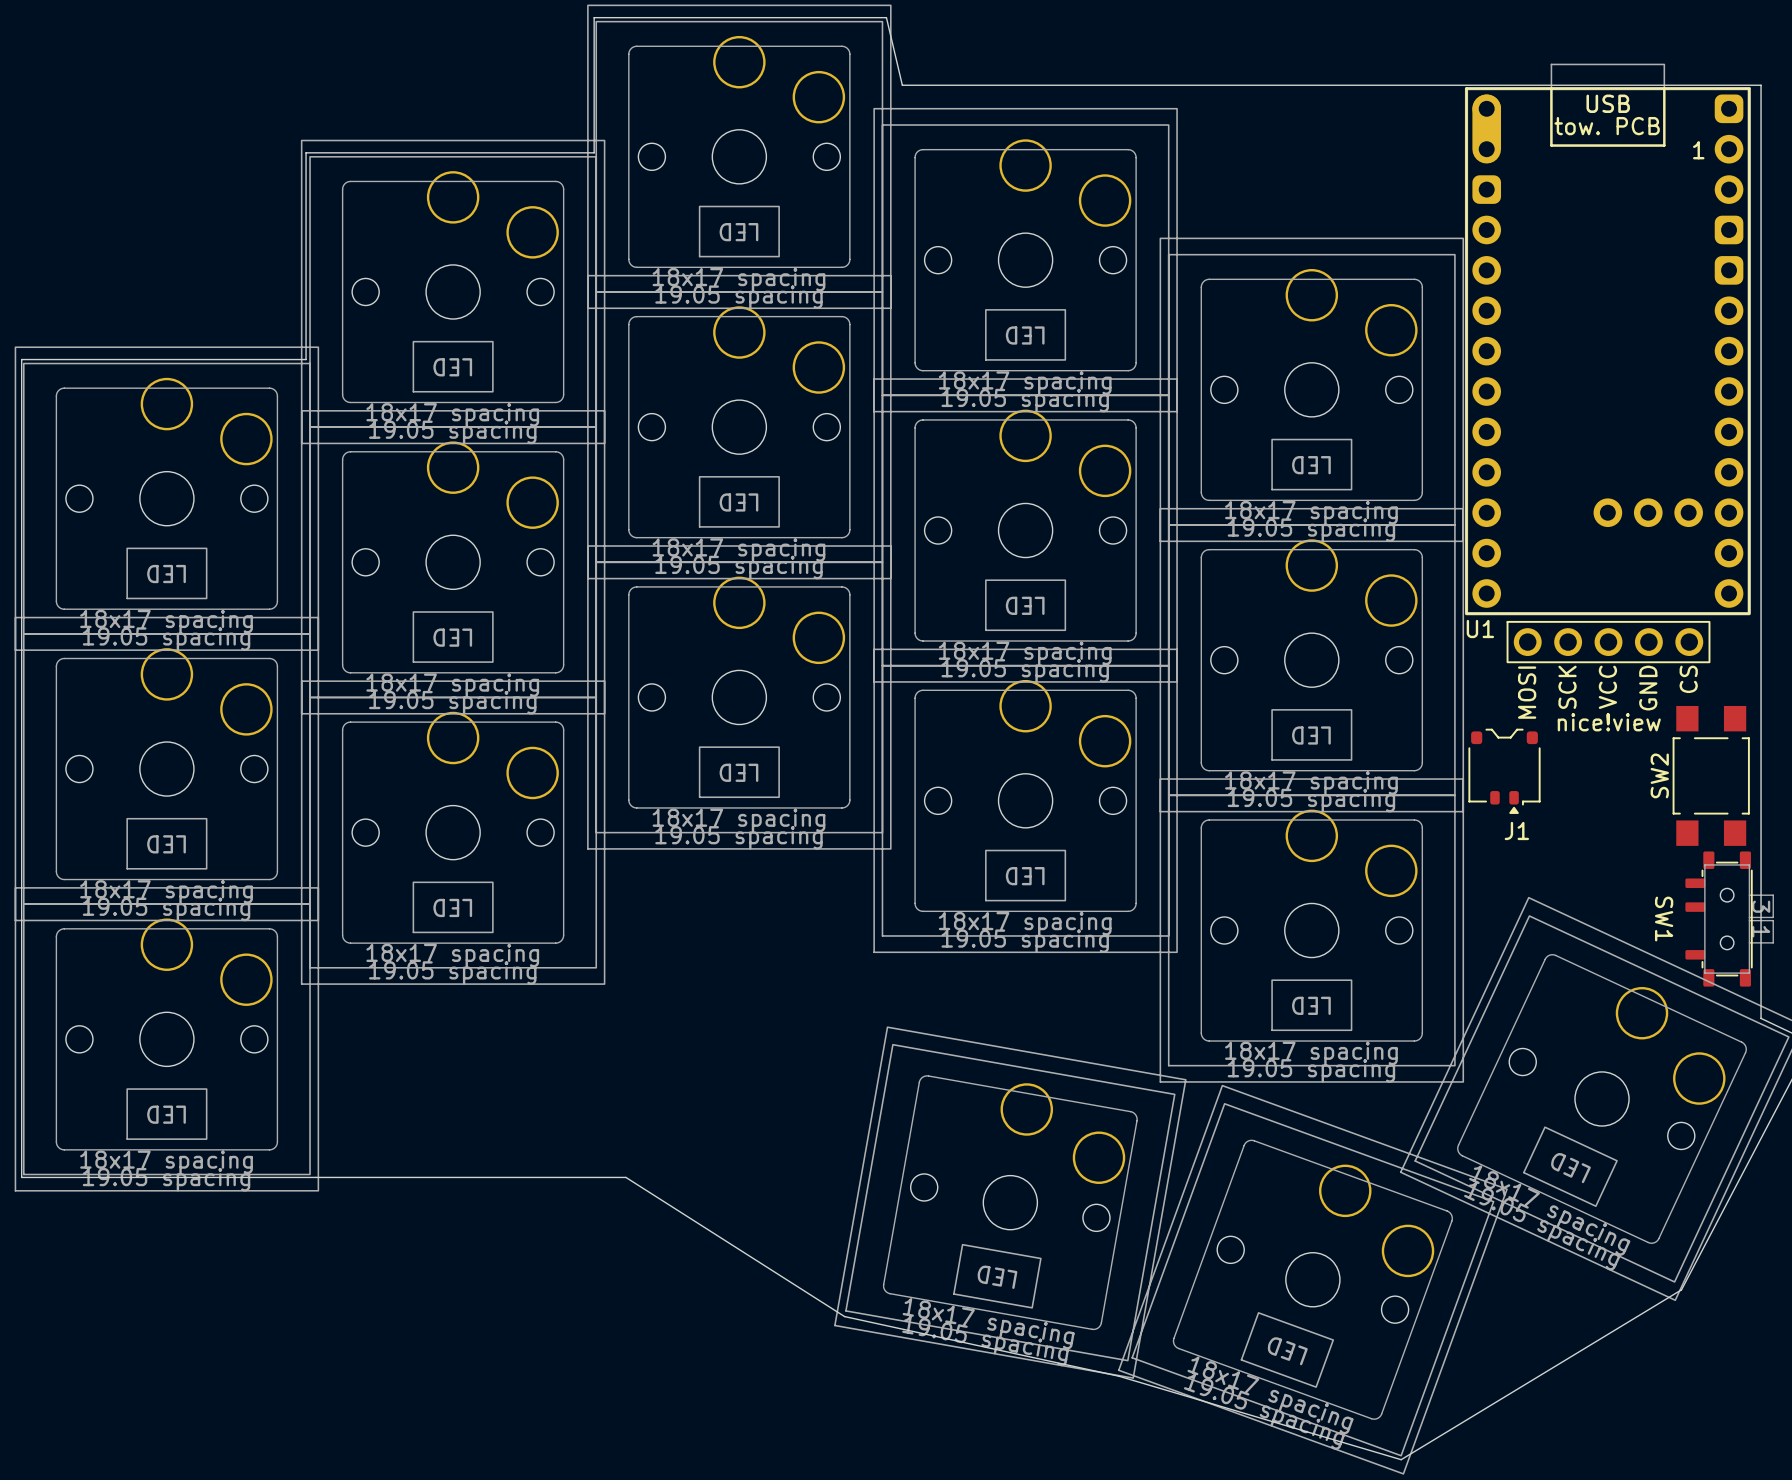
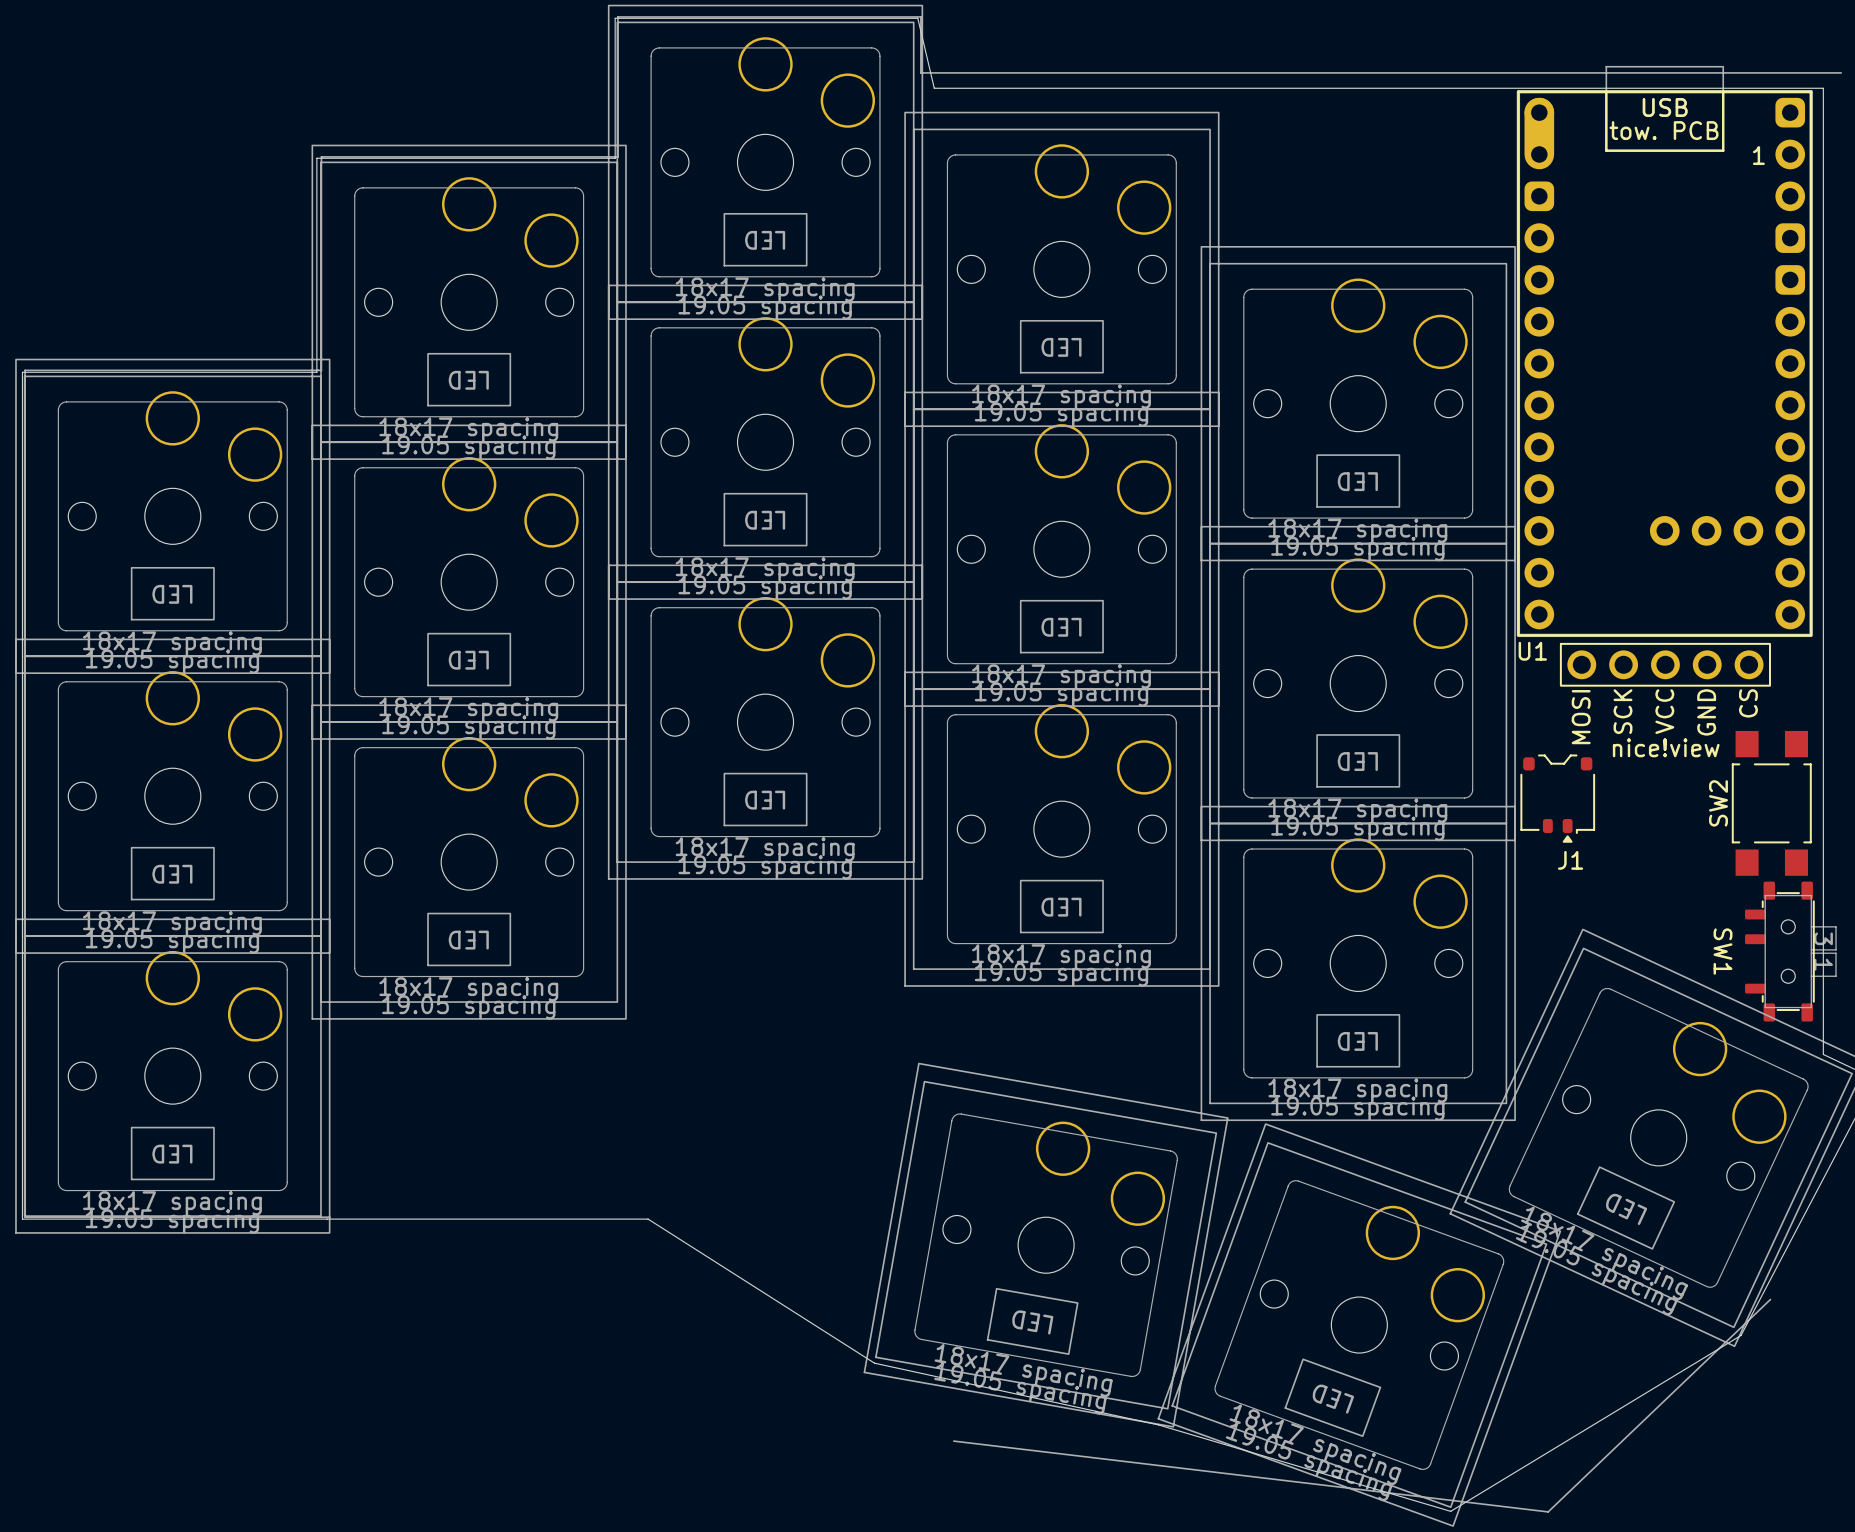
line: none -> (1841, 72) (920, 72) (920, 16) (617, 16) (617, 156) (321, 156) (321, 370) (25, 370) (25, 1217) (329, 1217)
line: none -> (1770, 1299) (1548, 1511) (953, 1441)

